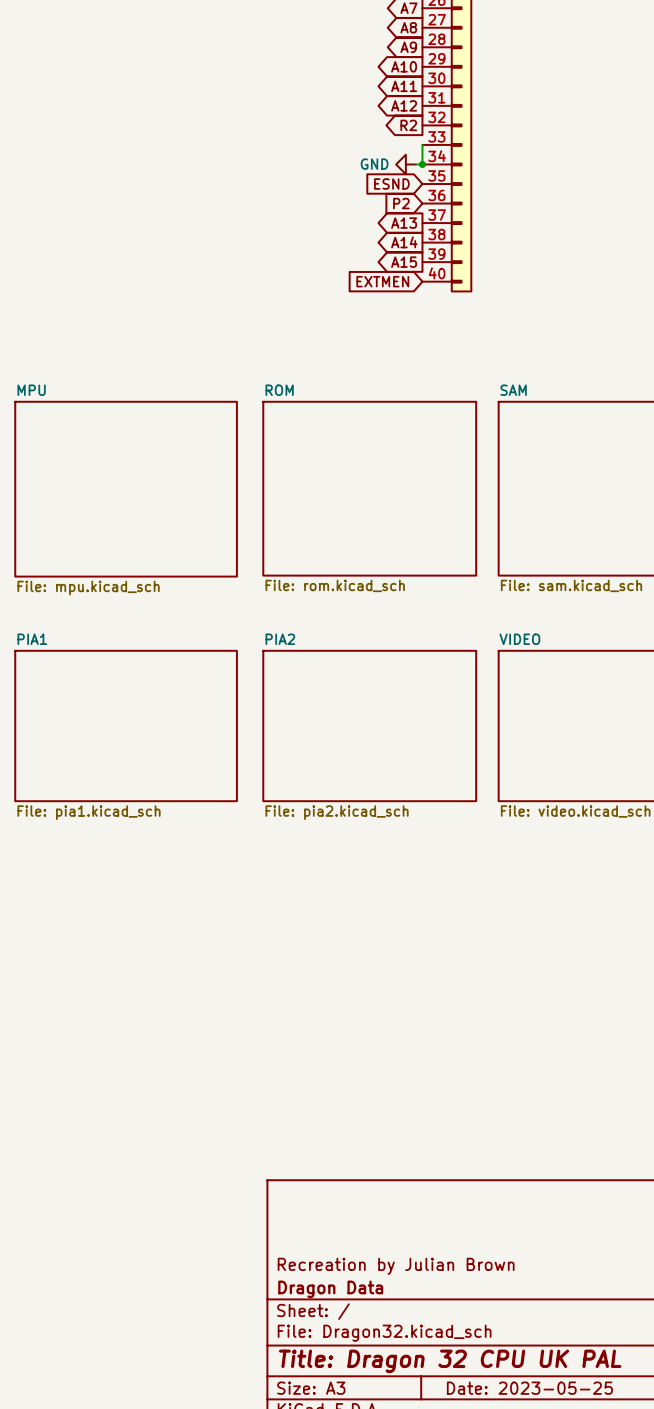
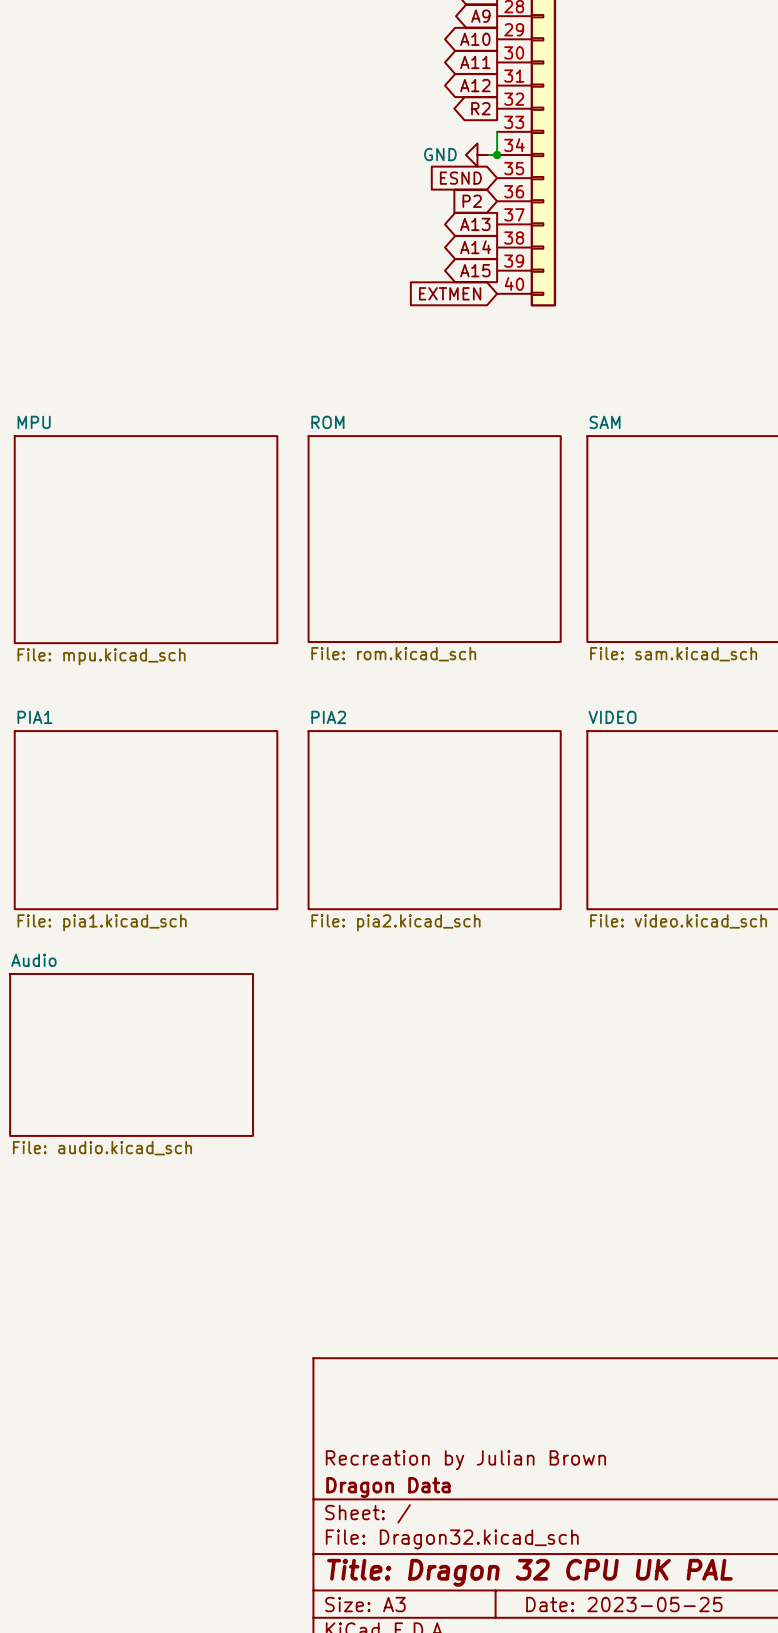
sheet Audio: none -> File: audio.kicad_sch (131, 1054)

